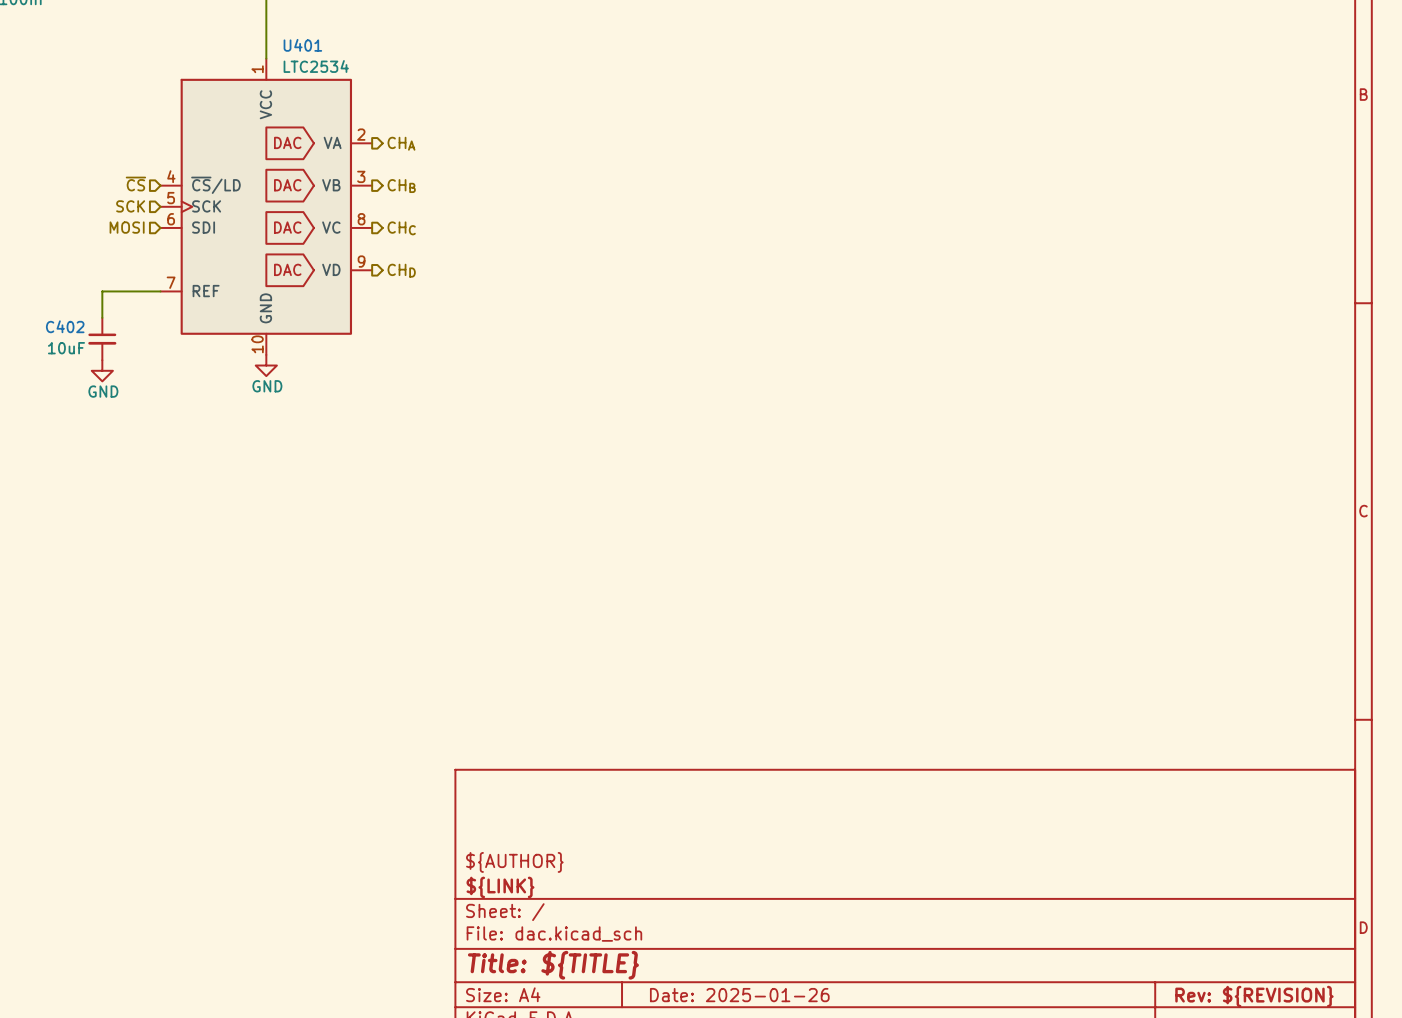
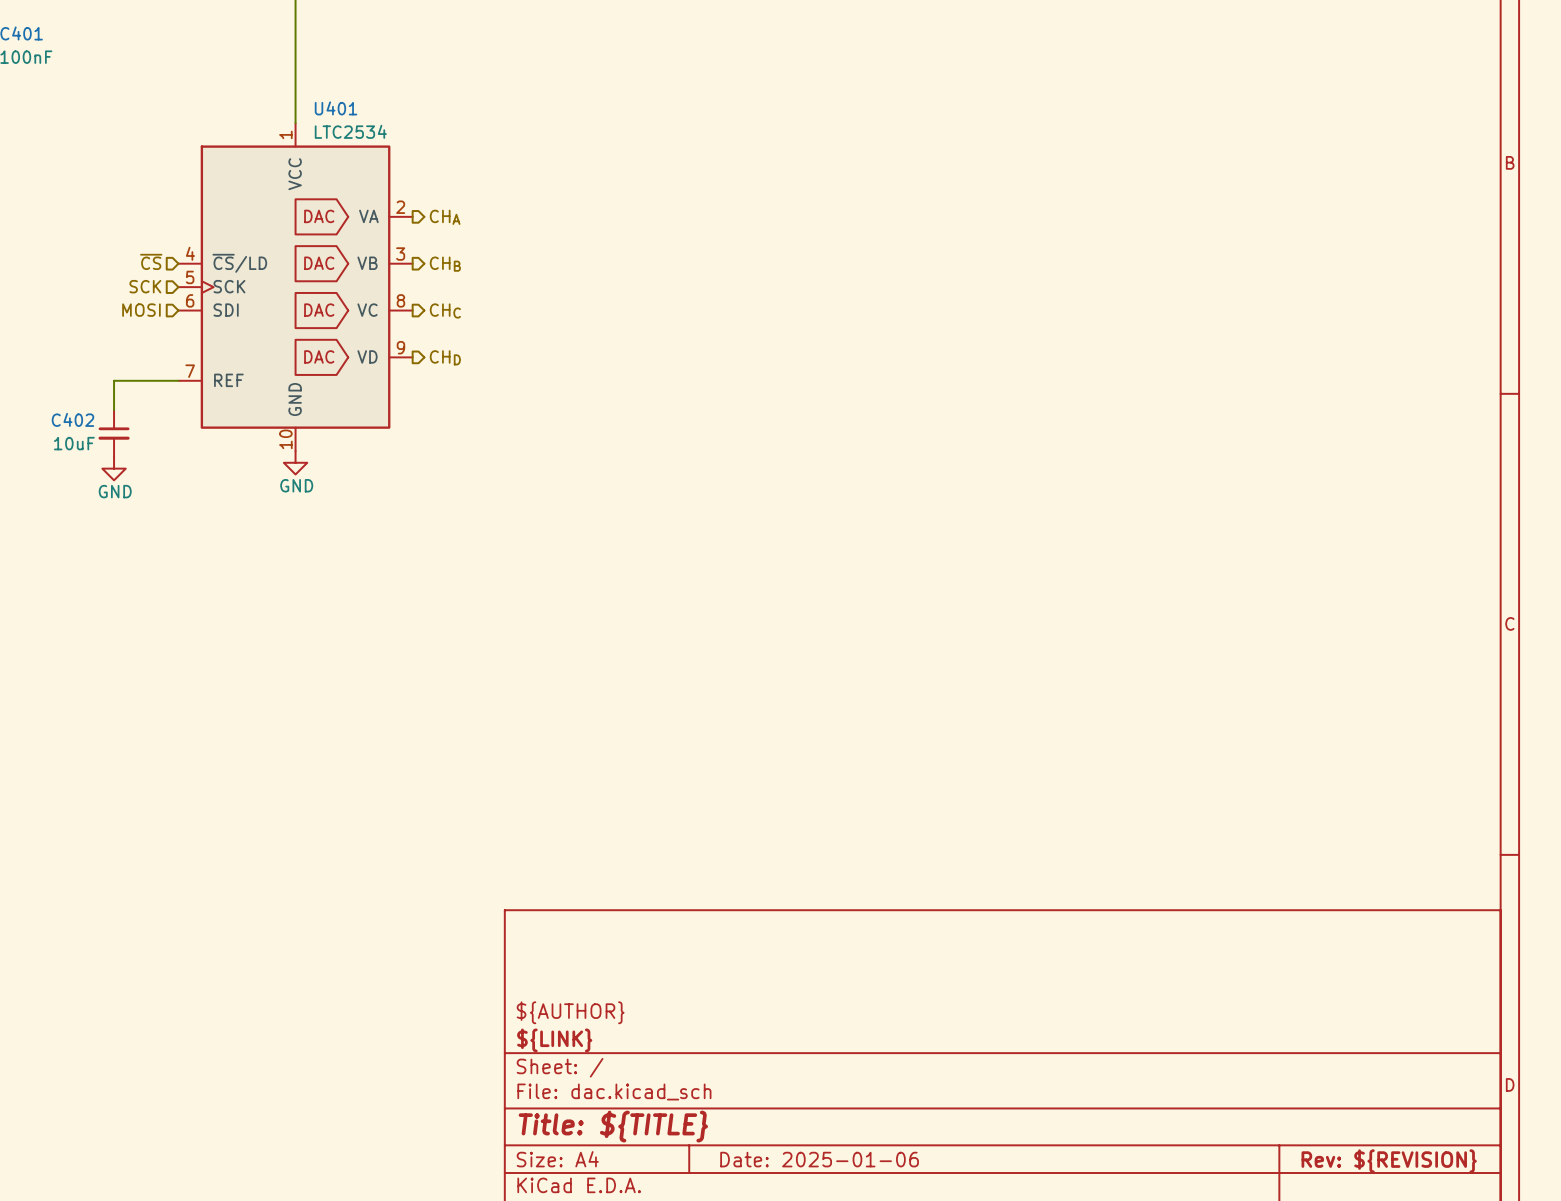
title block: Date: 2025-01-26 (739, 995) -> Date: 2025-01-06 (819, 1159)

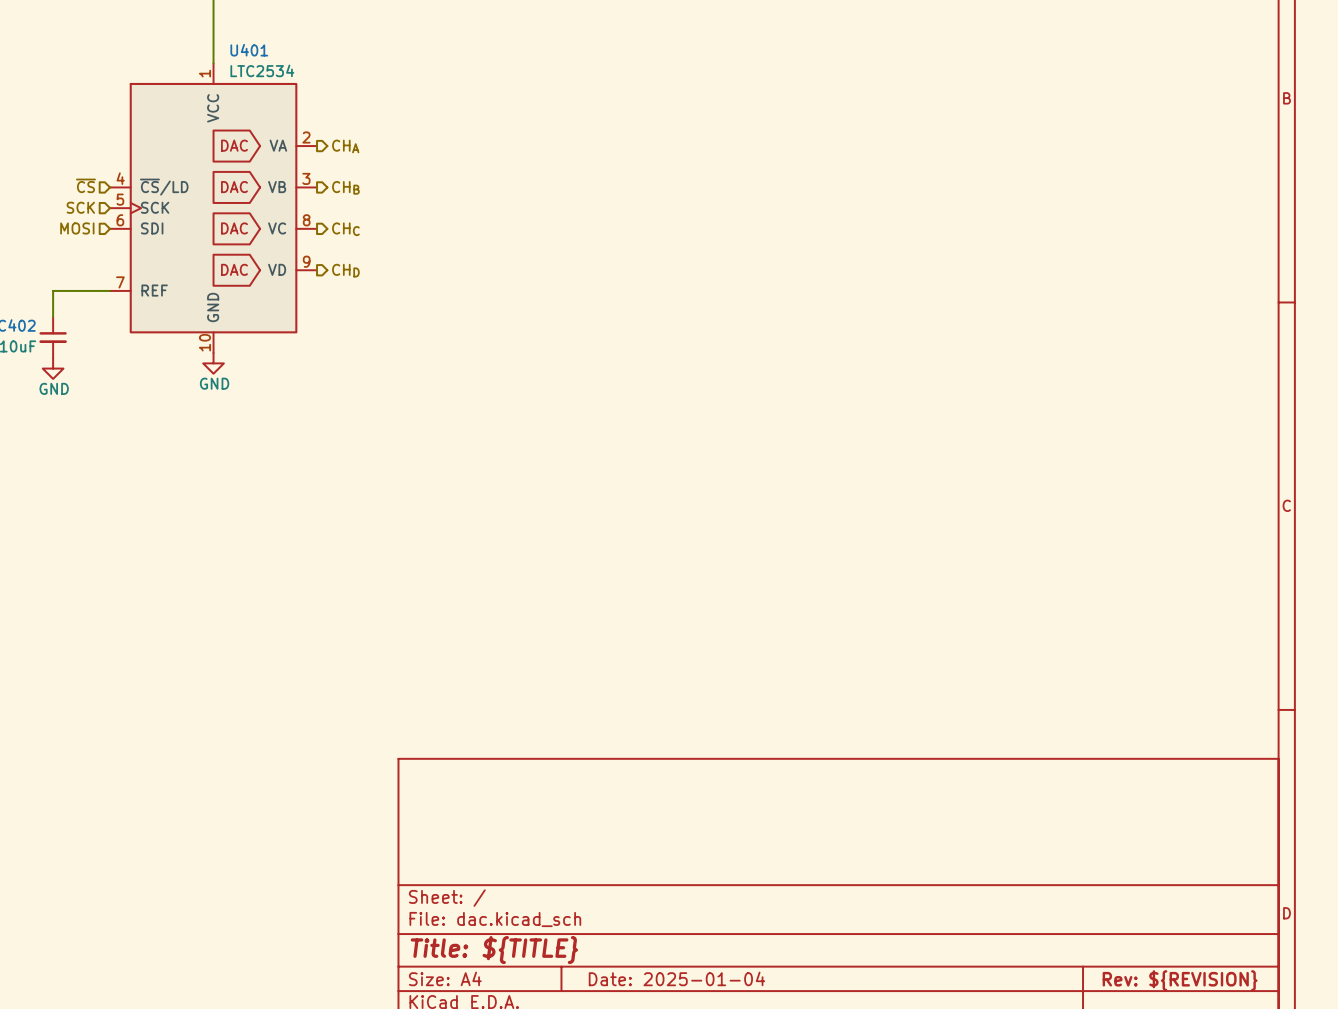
title block: ${AUTHOR} (570, 1012) -> none
title block: ${LINK} (554, 1040) -> none
title block: Date: 2025-01-06 (819, 1159) -> Date: 2025-01-04 (676, 978)

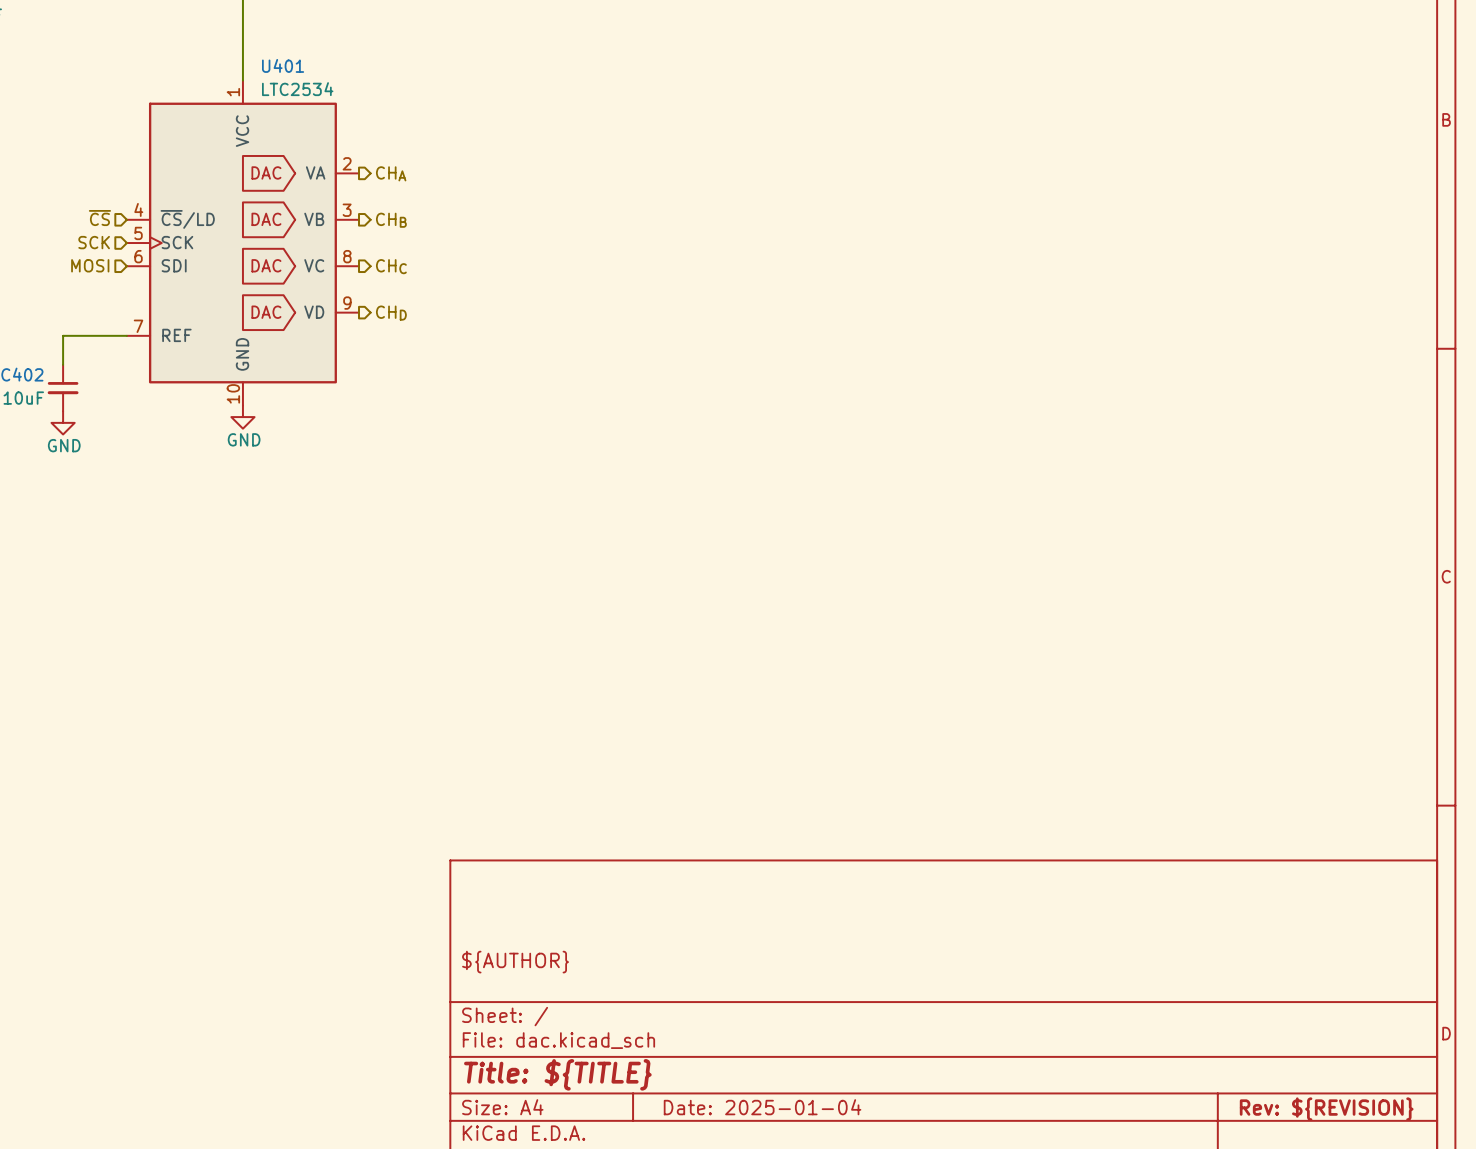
title block: none -> ${AUTHOR} (515, 962)

